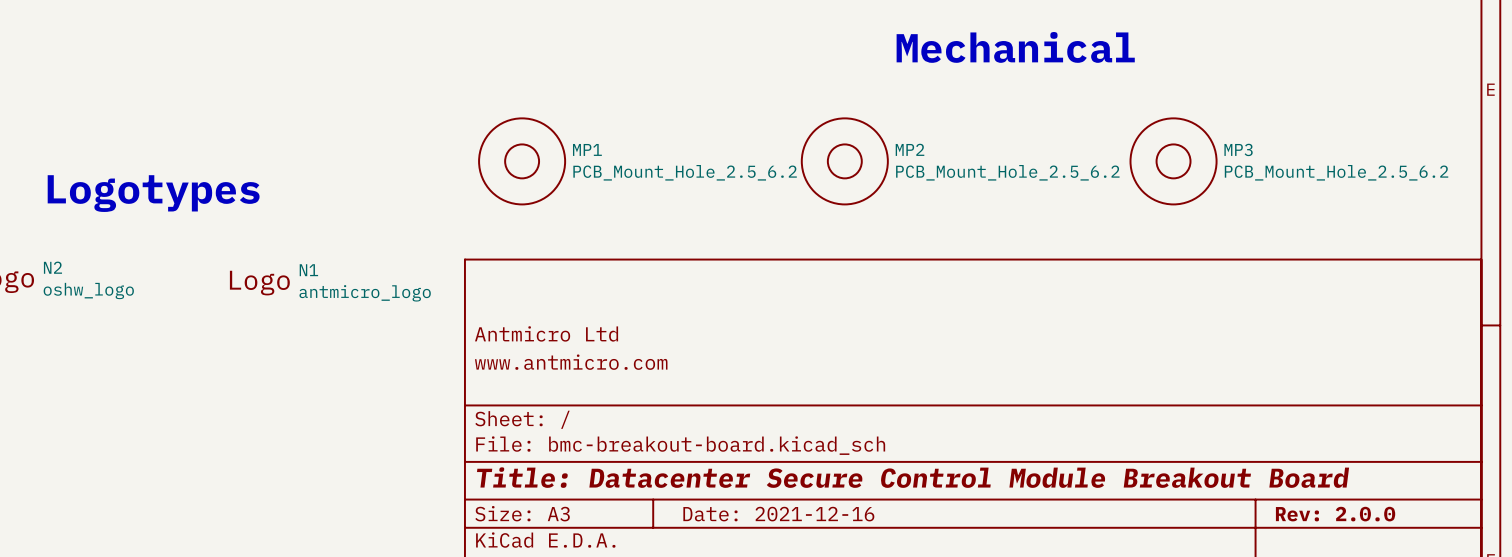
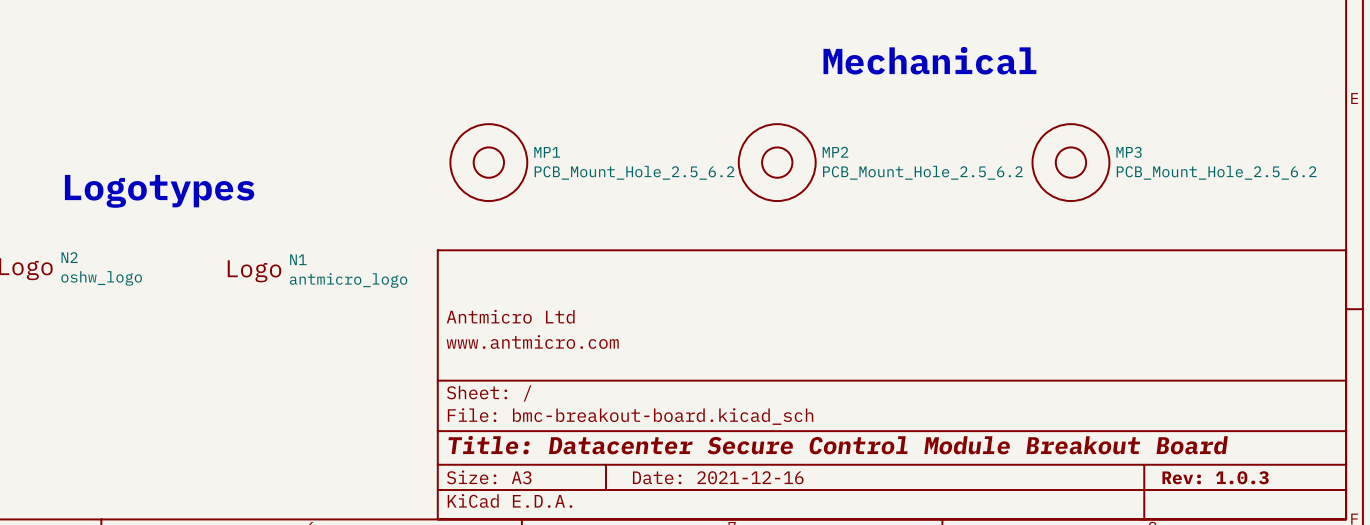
title block: Rev: 2.0.0 (1335, 514) -> Rev: 1.0.3 (1215, 477)

